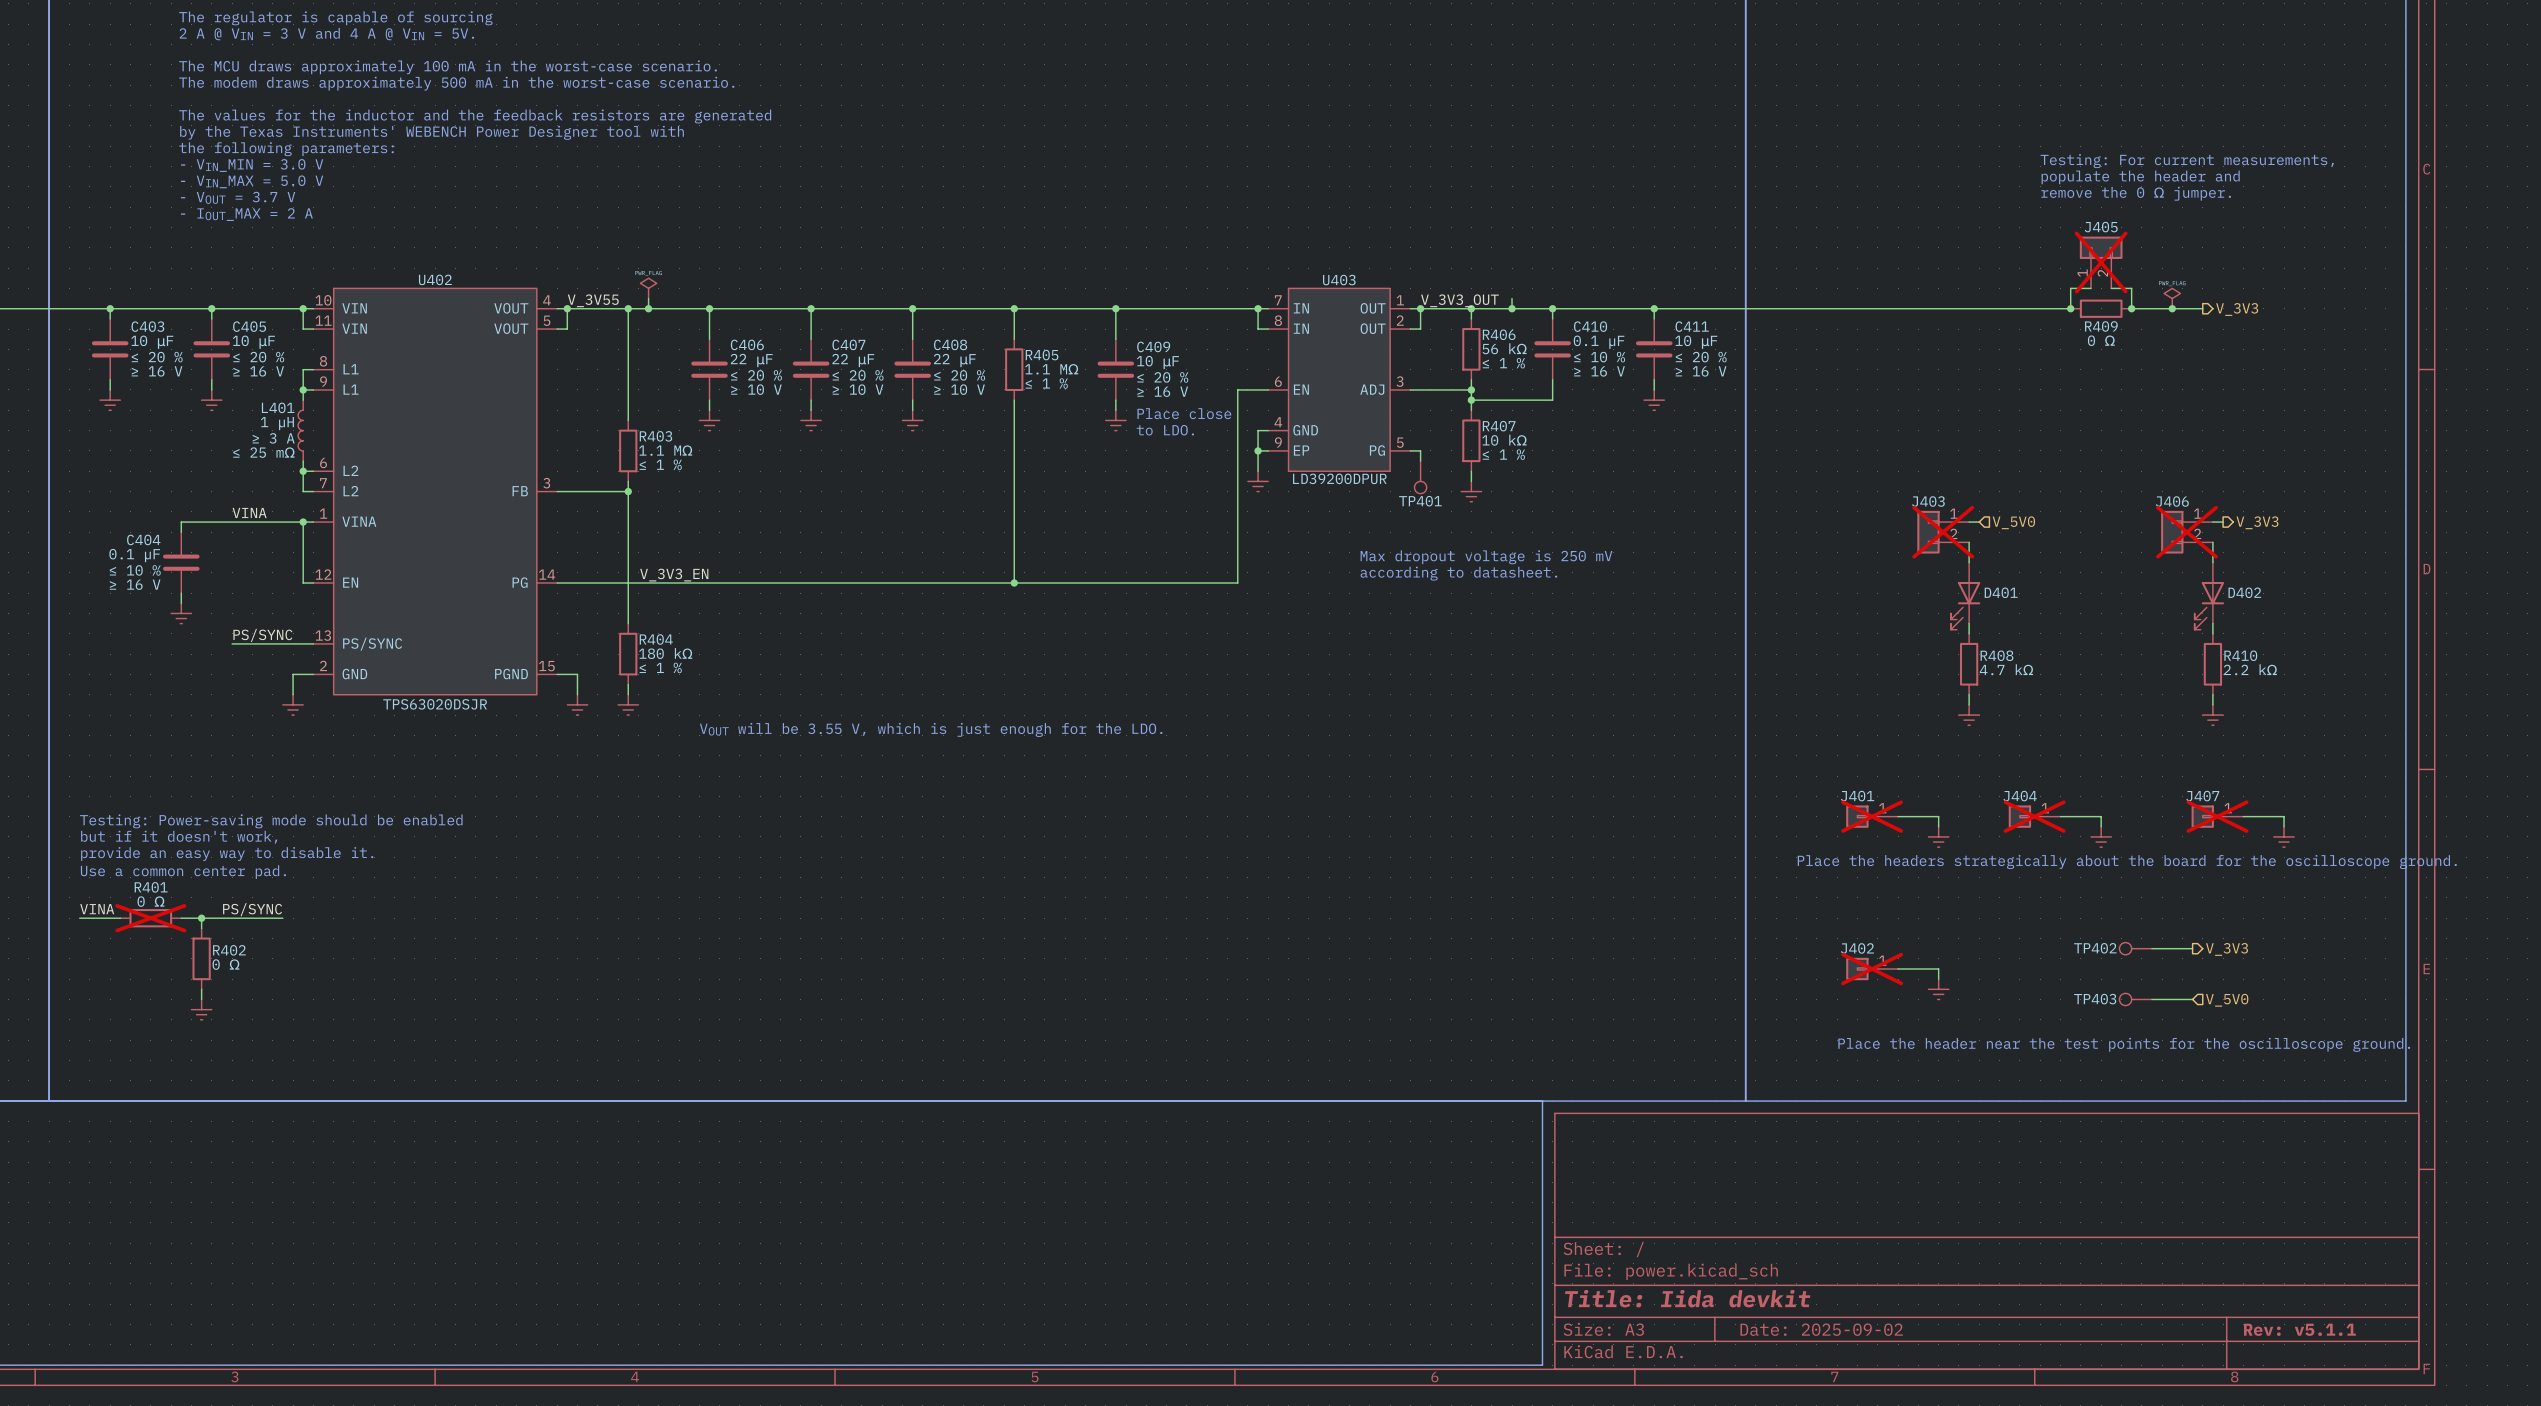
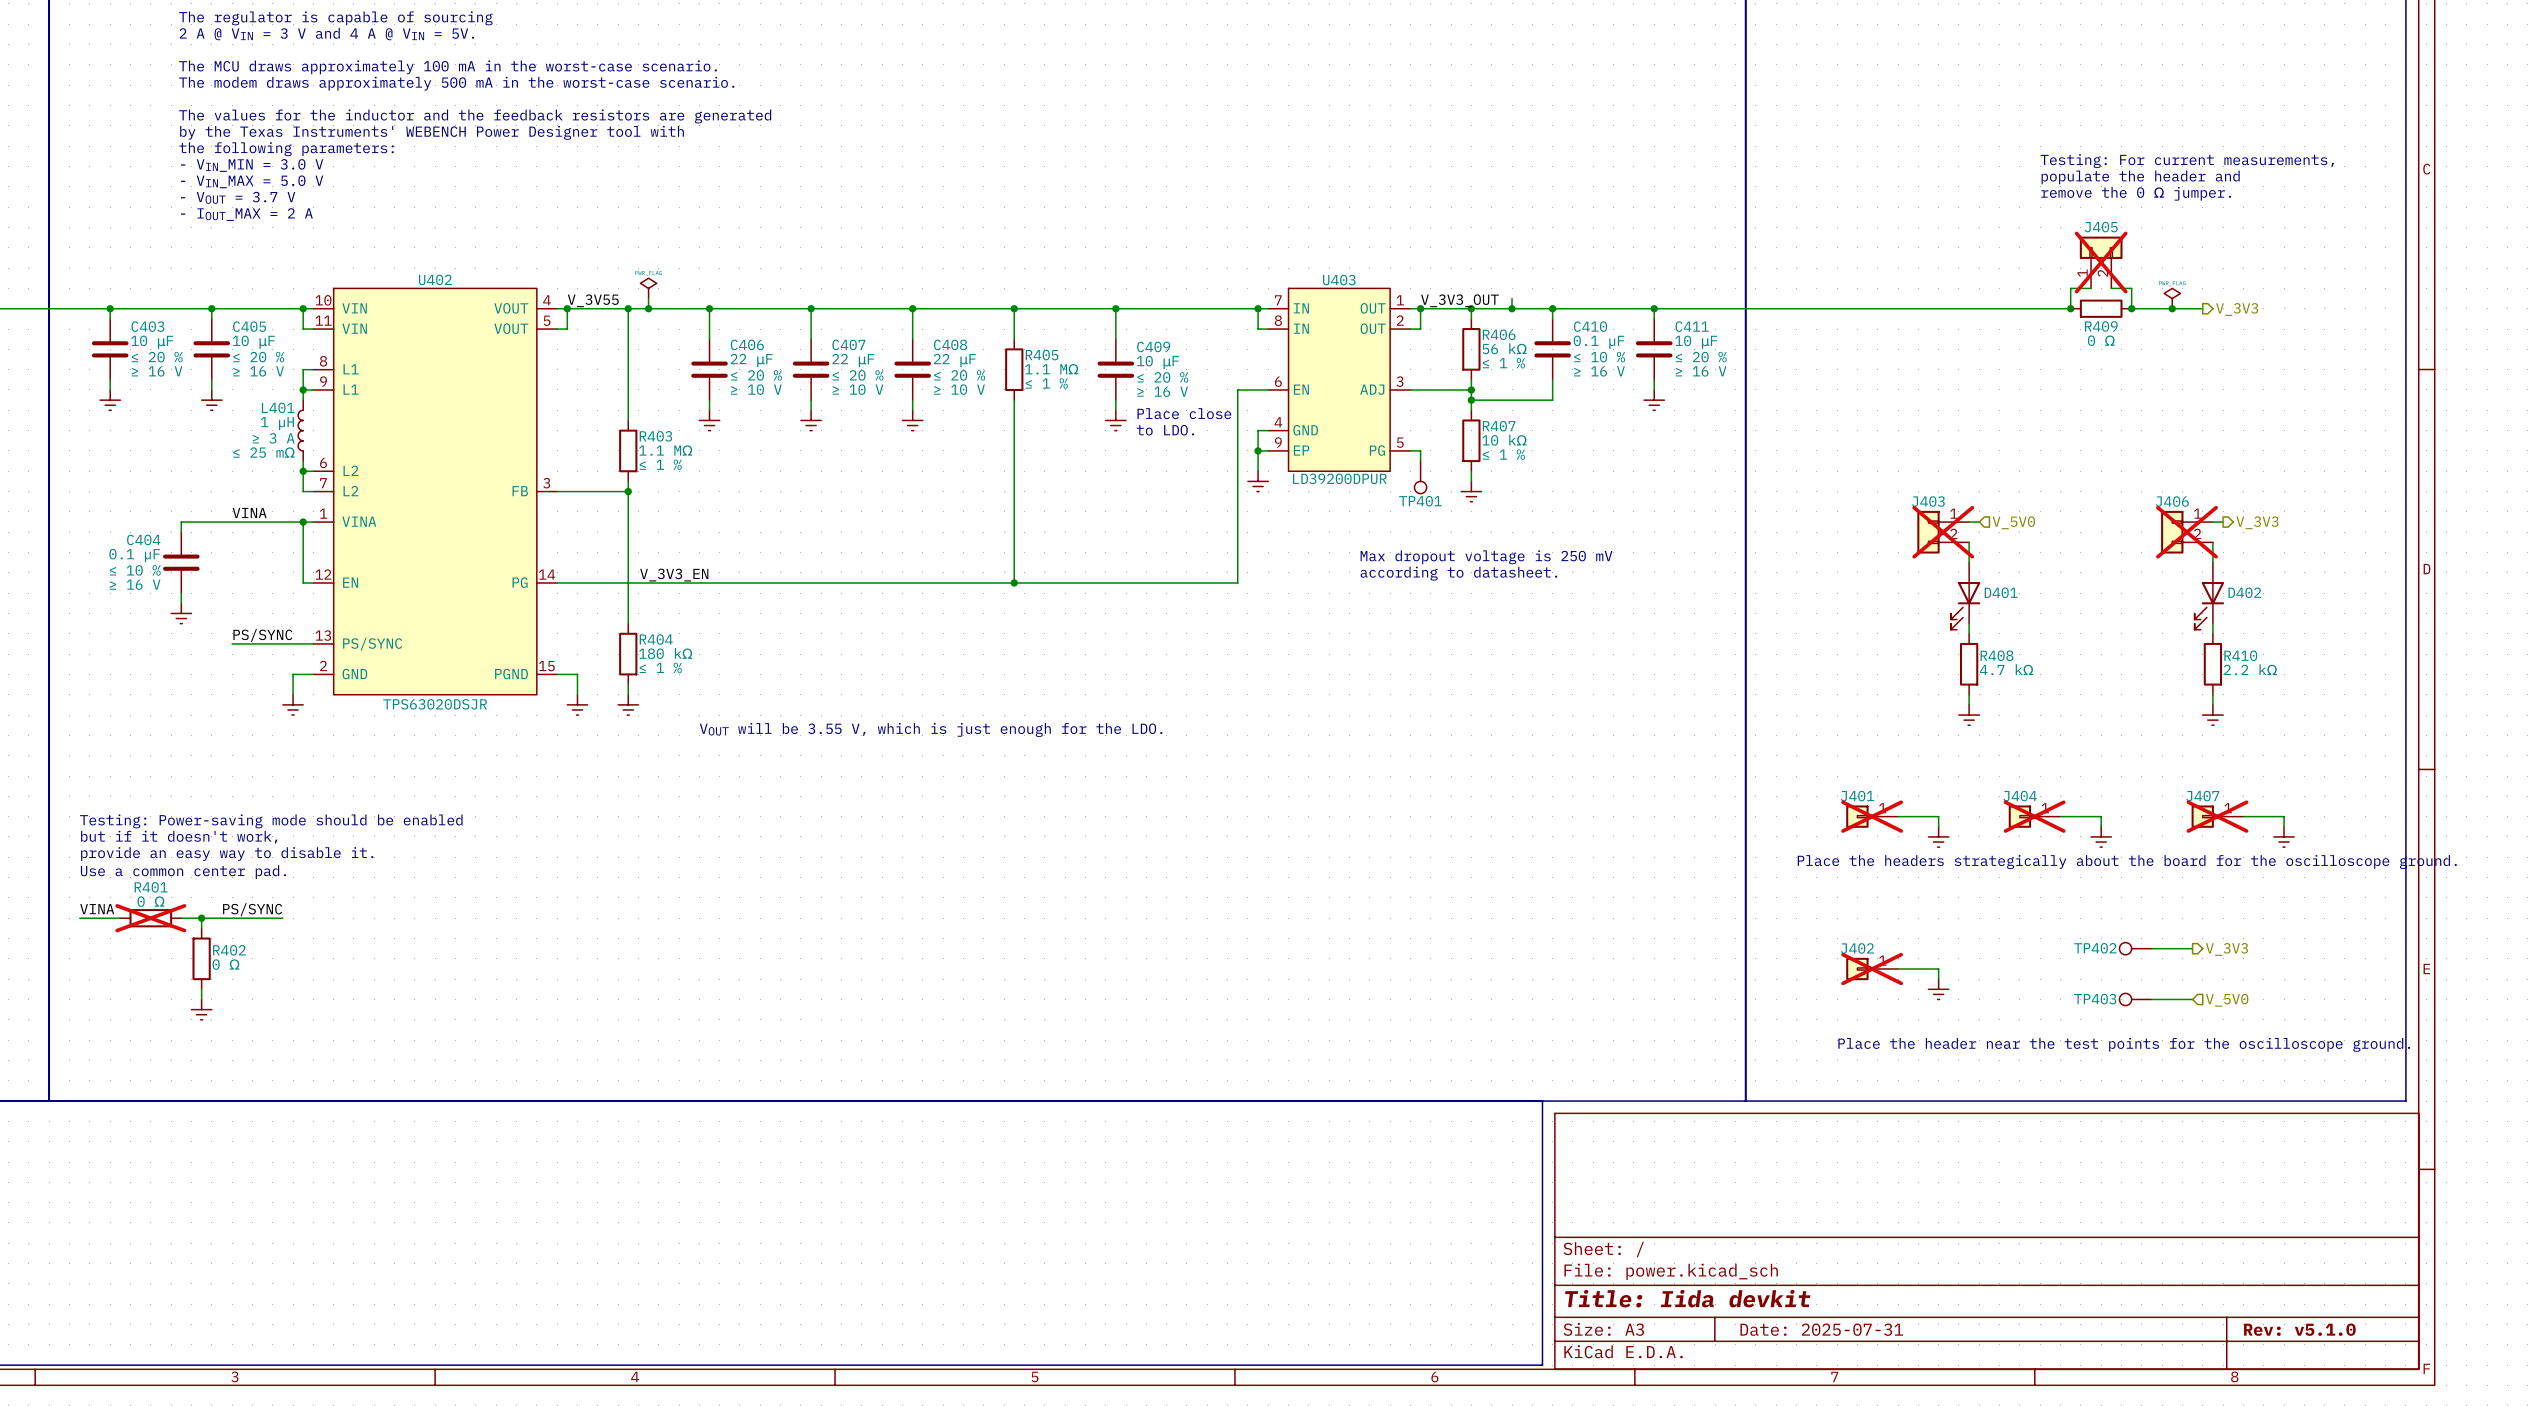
title block: Date: 2025-09-02 (1821, 1329) -> Date: 2025-07-31 (1821, 1329)
title block: Rev: v5.1.1 (2299, 1329) -> Rev: v5.1.0 (2299, 1329)

